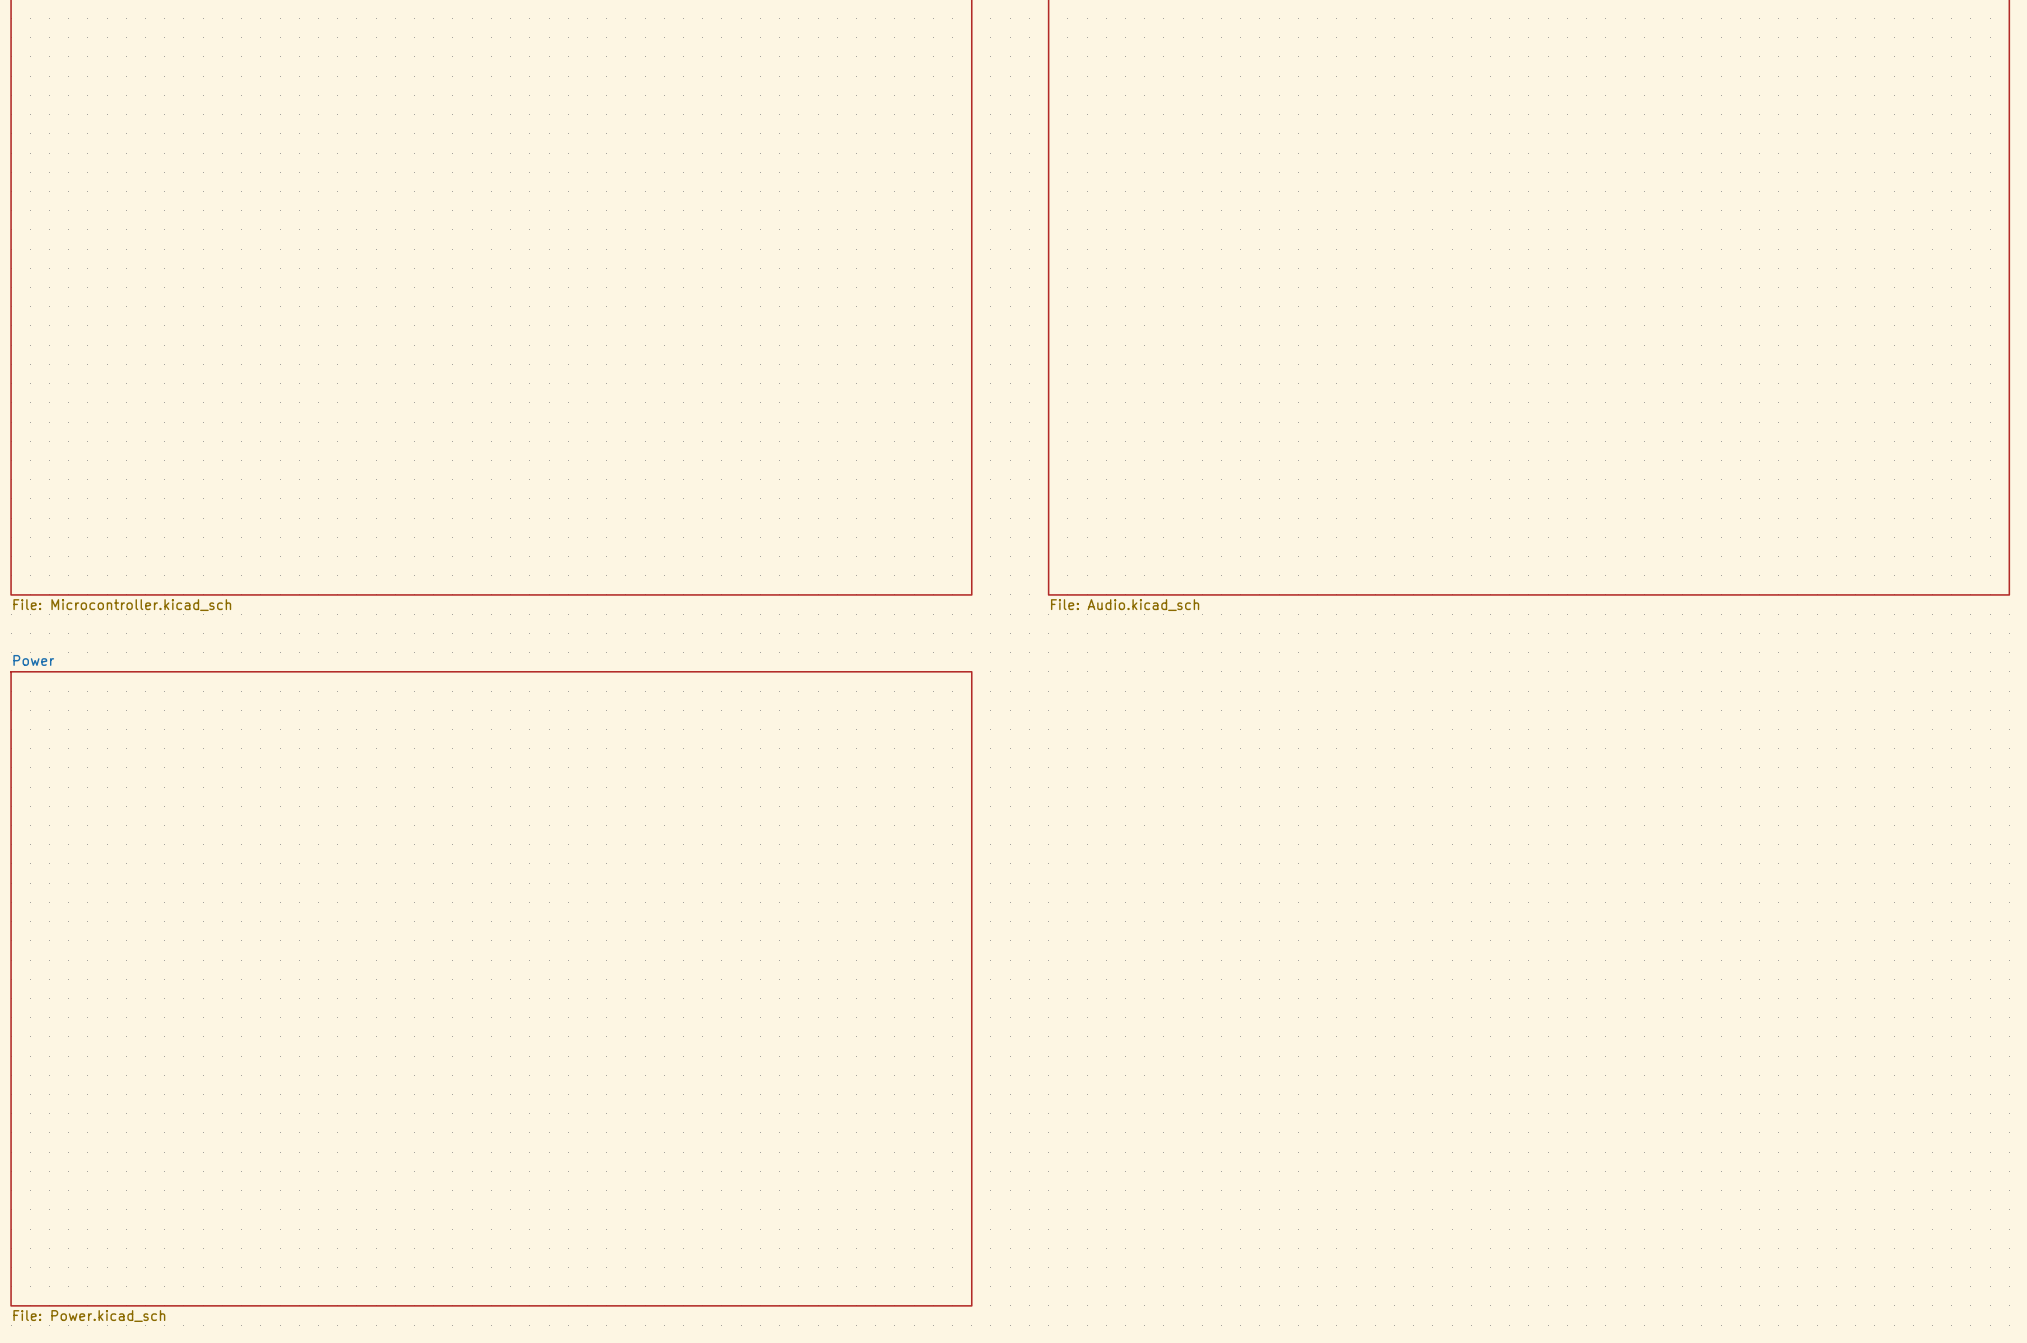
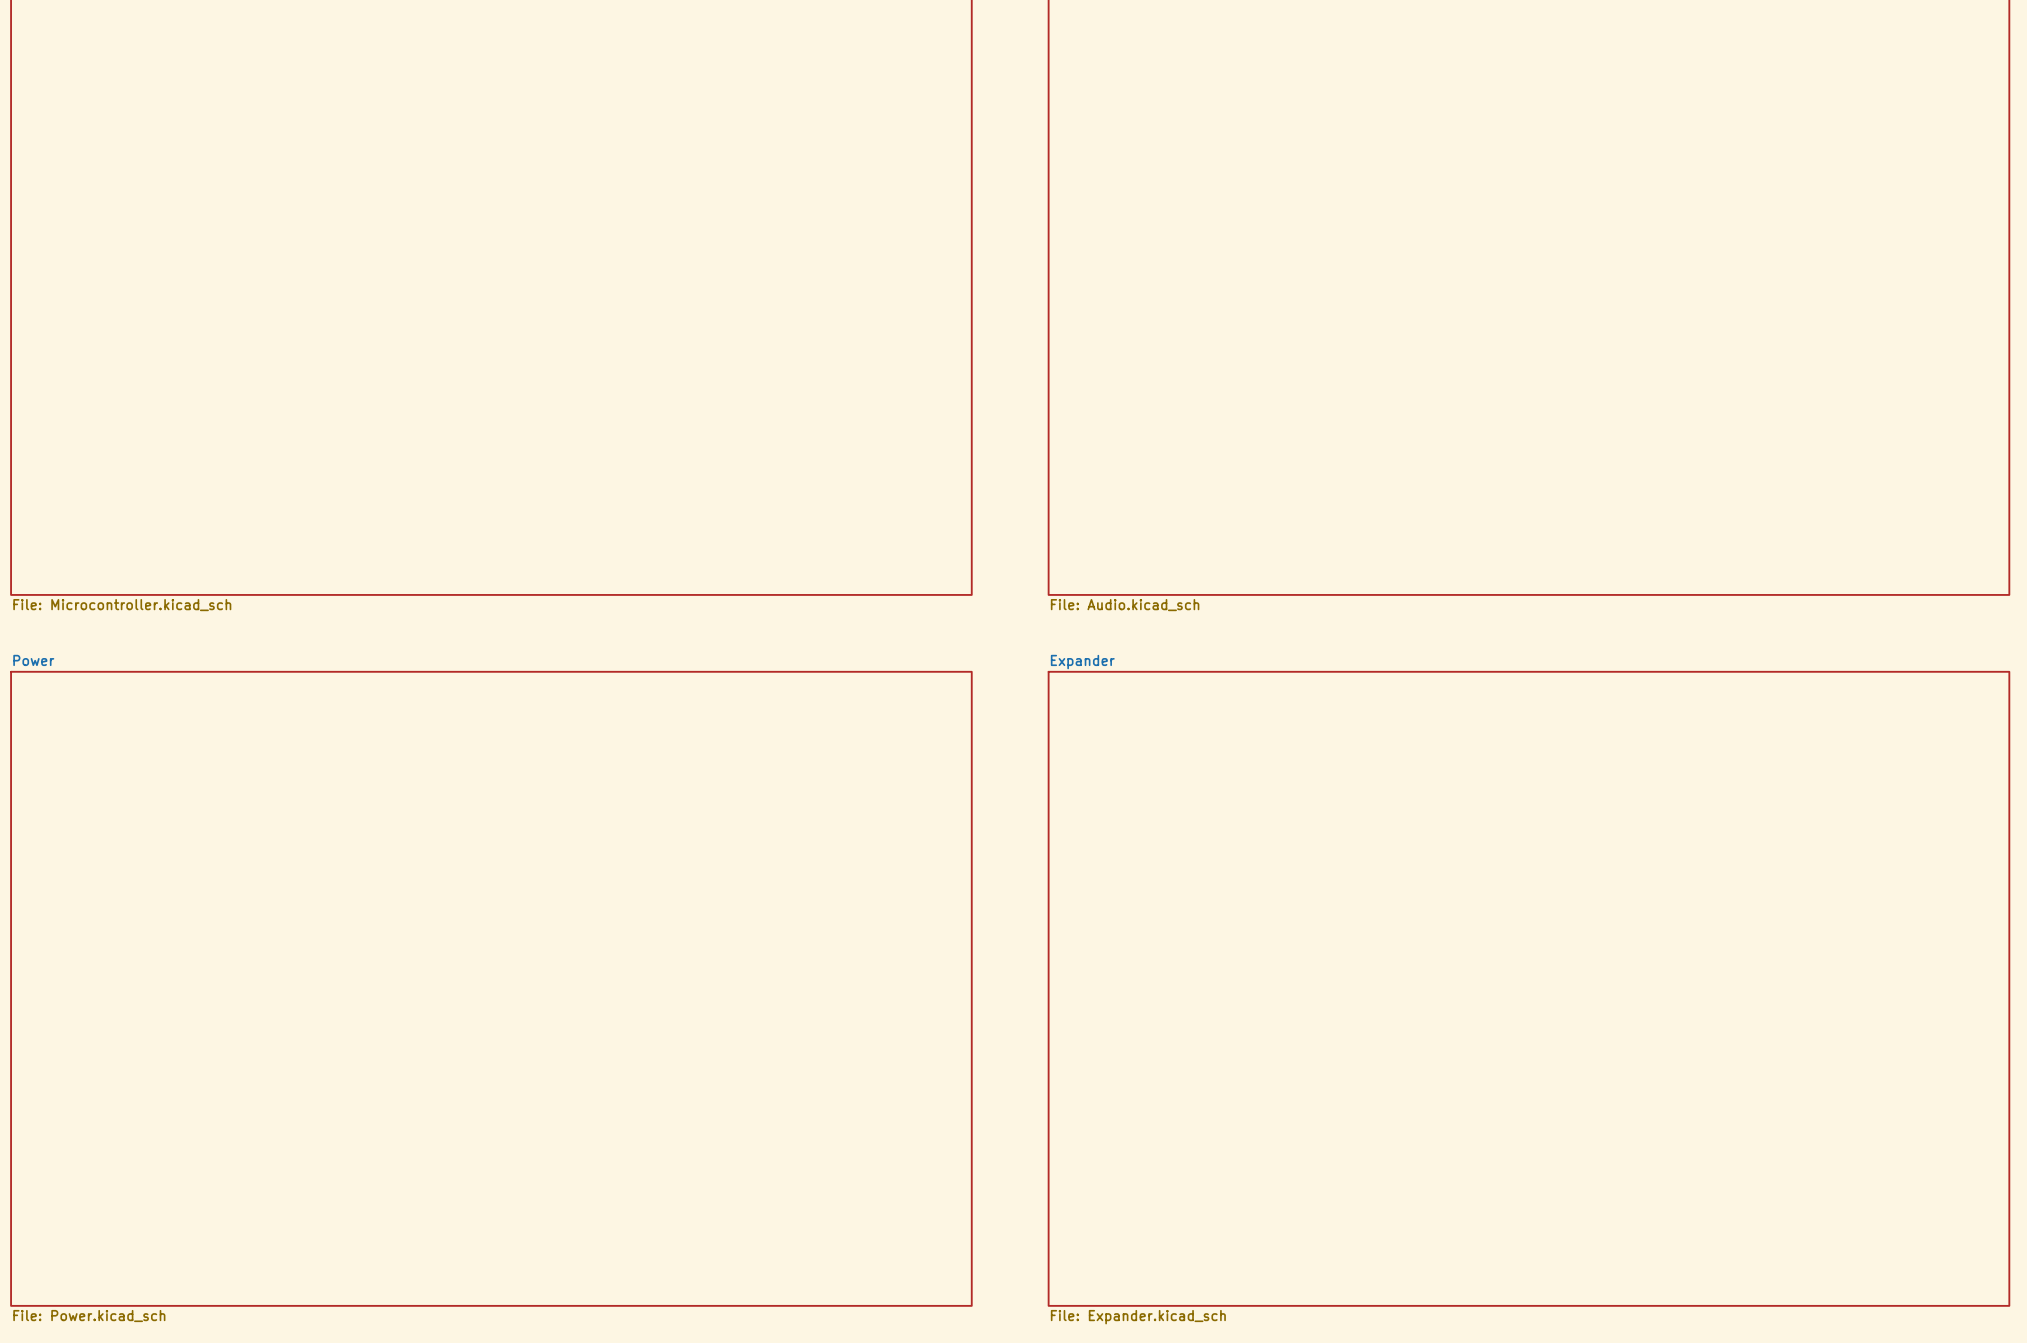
sheet Expander: none -> File: Expander.kicad_sch (1528, 988)

